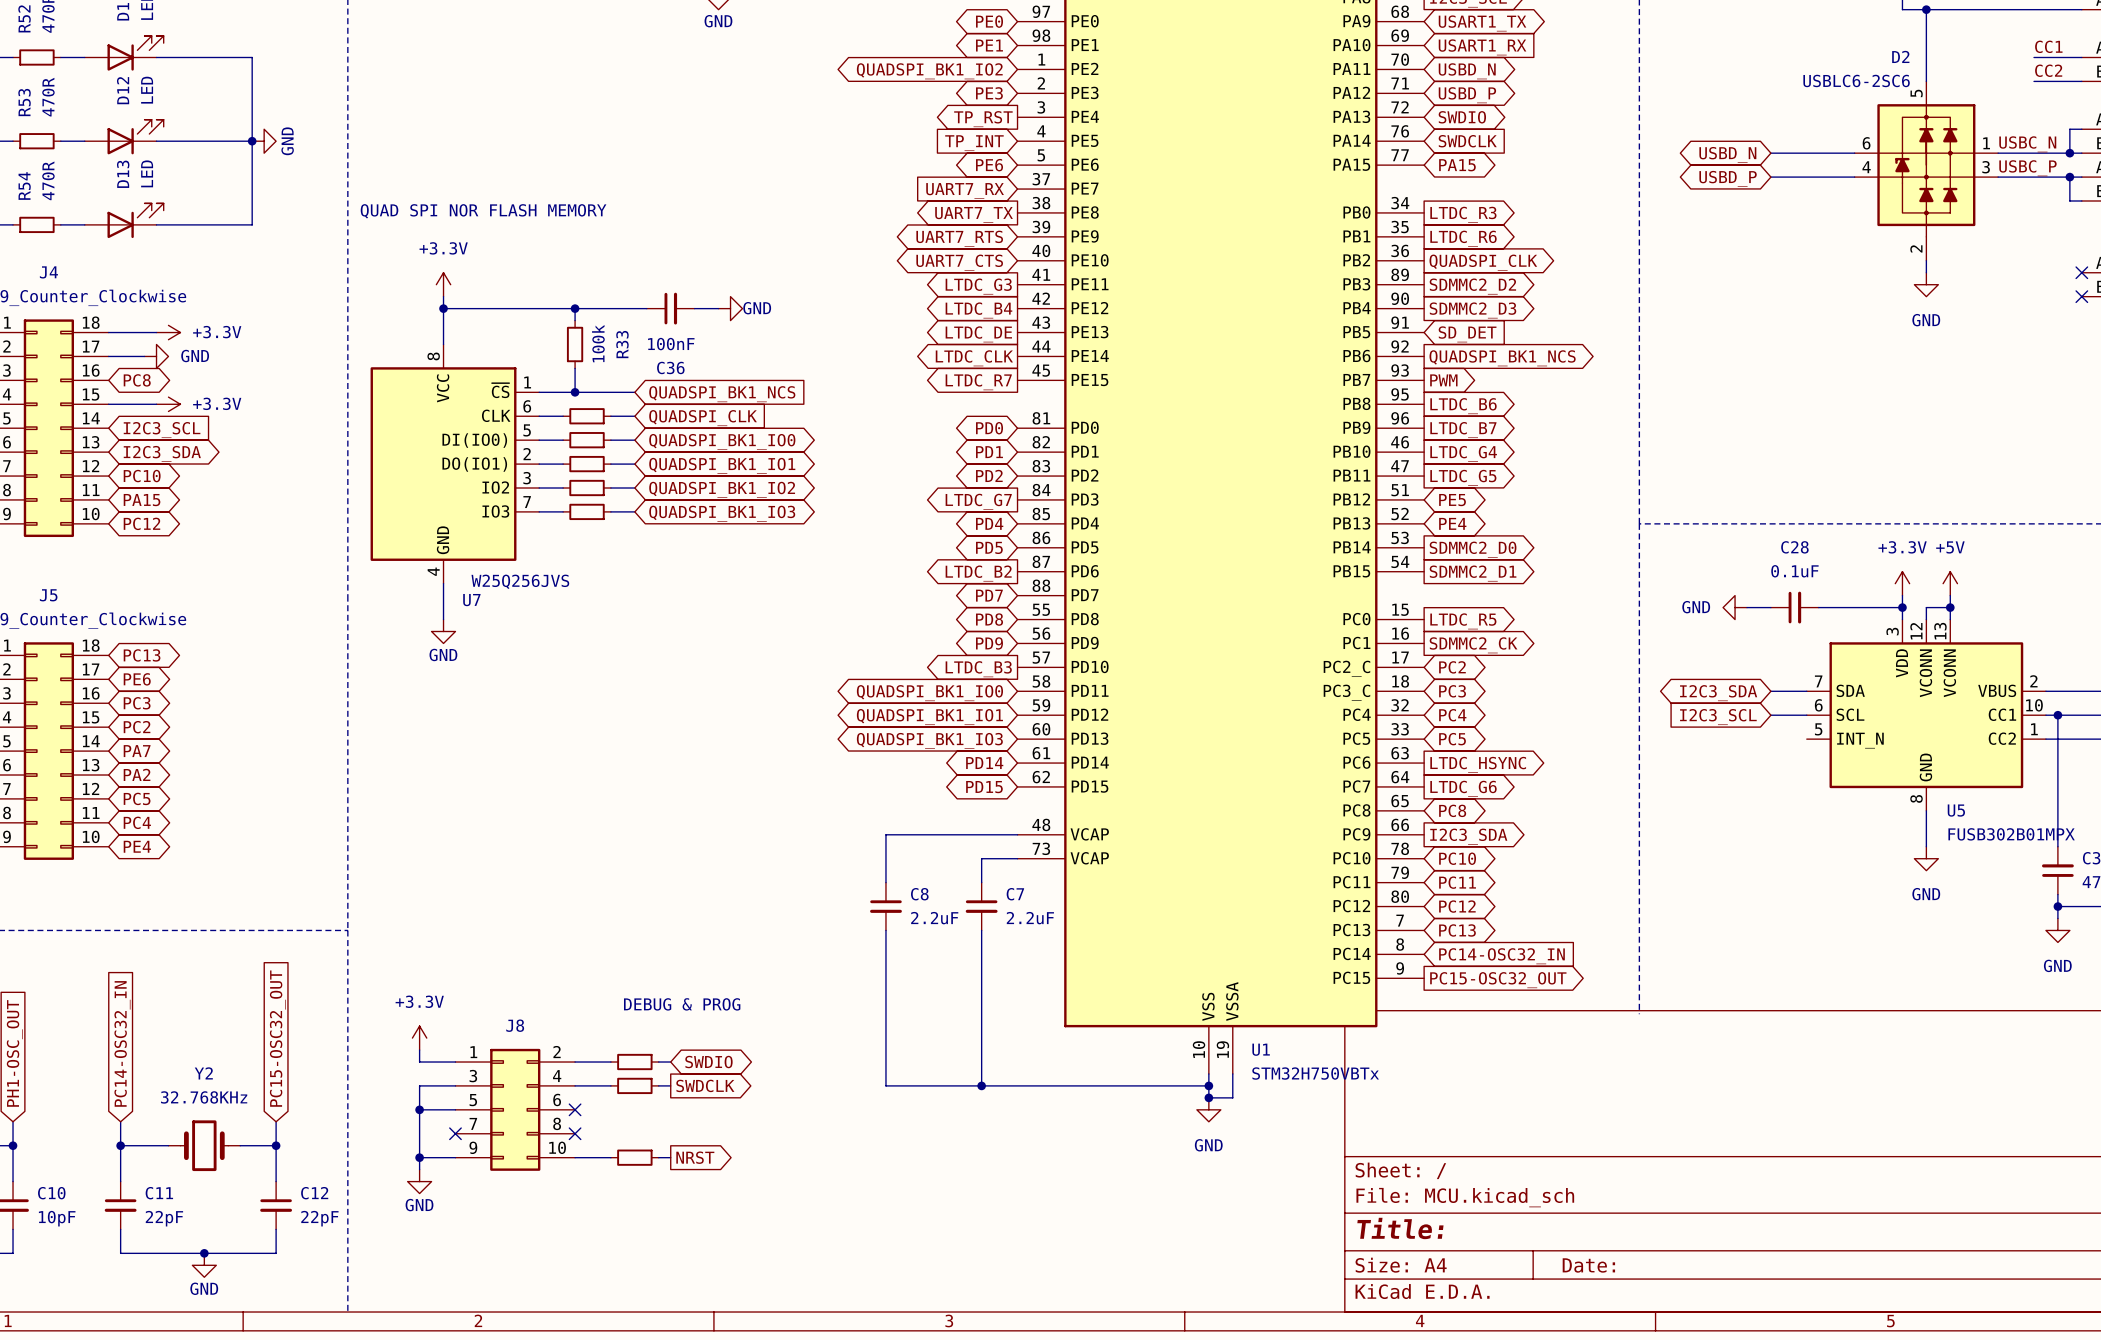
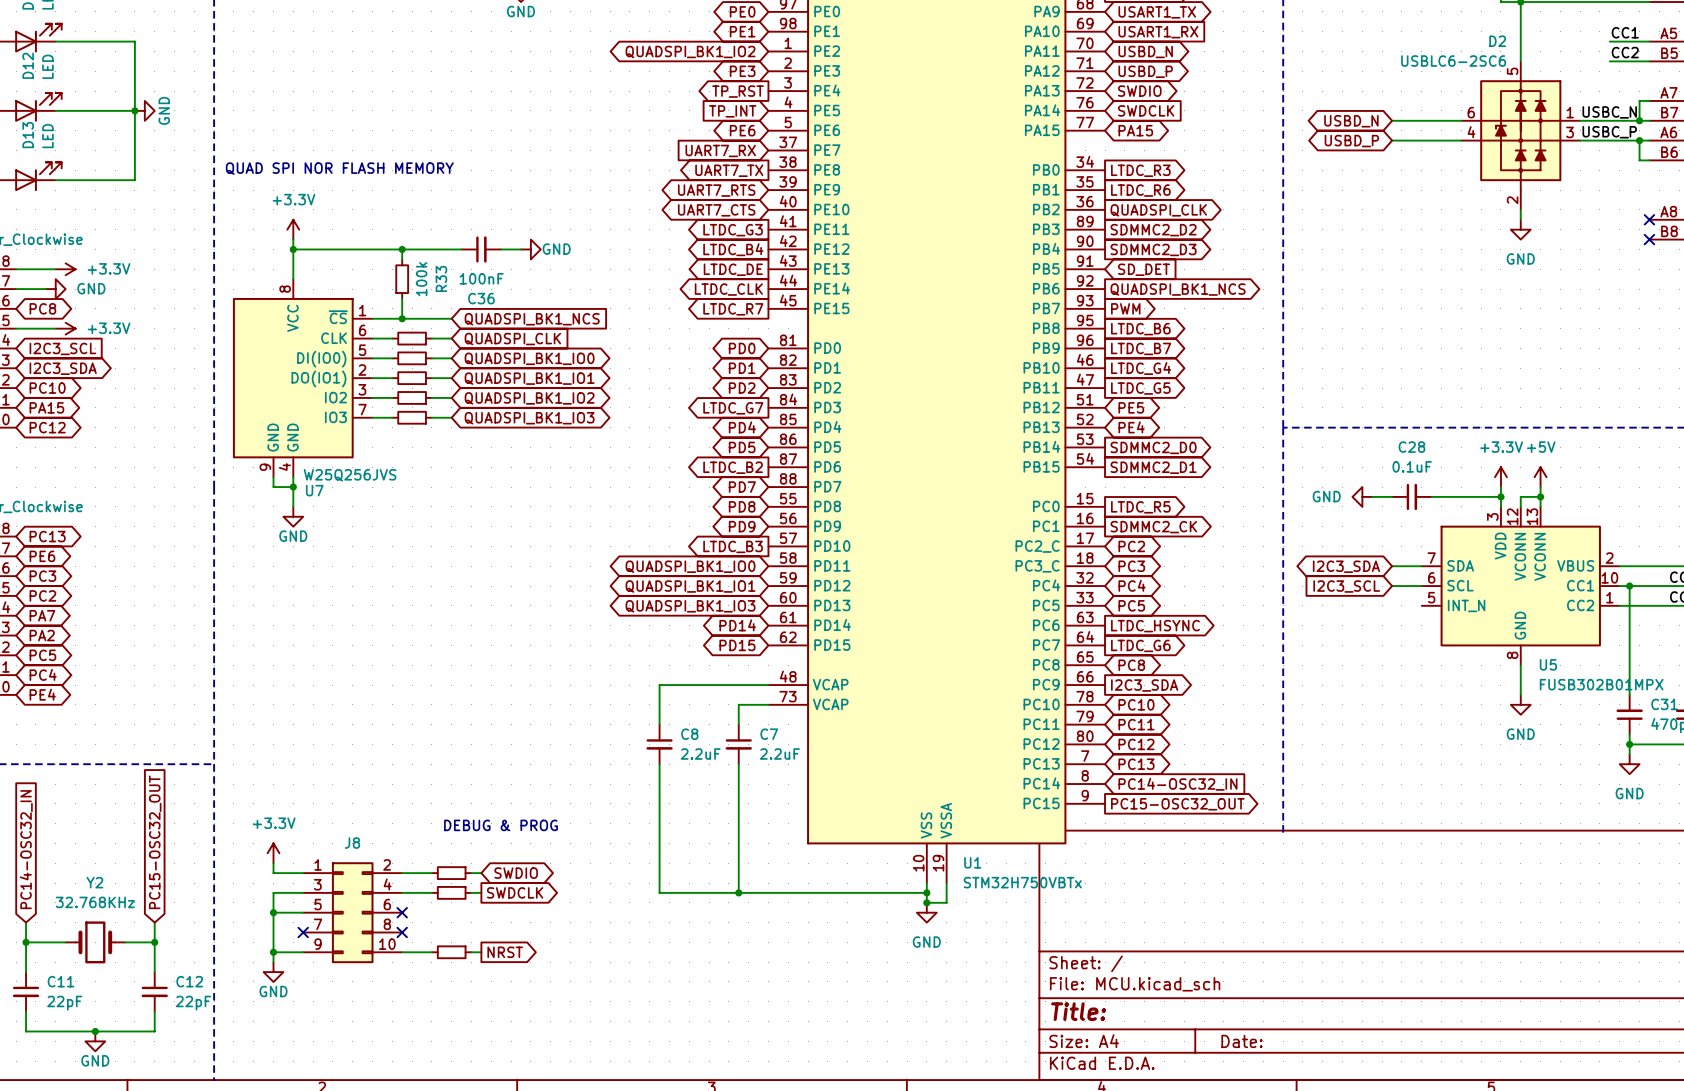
U7 symbol: [370, 344, 540, 584] -> [232, 279, 373, 478]
wire: none -> (273, 477) (273, 487) (293, 487)
junction: none -> (293, 487)

